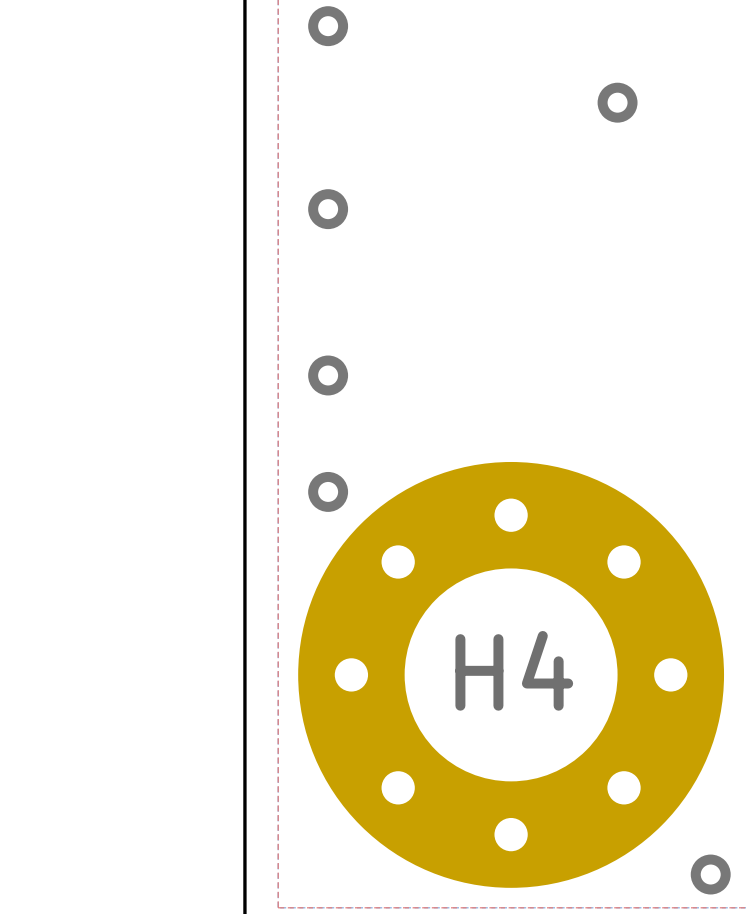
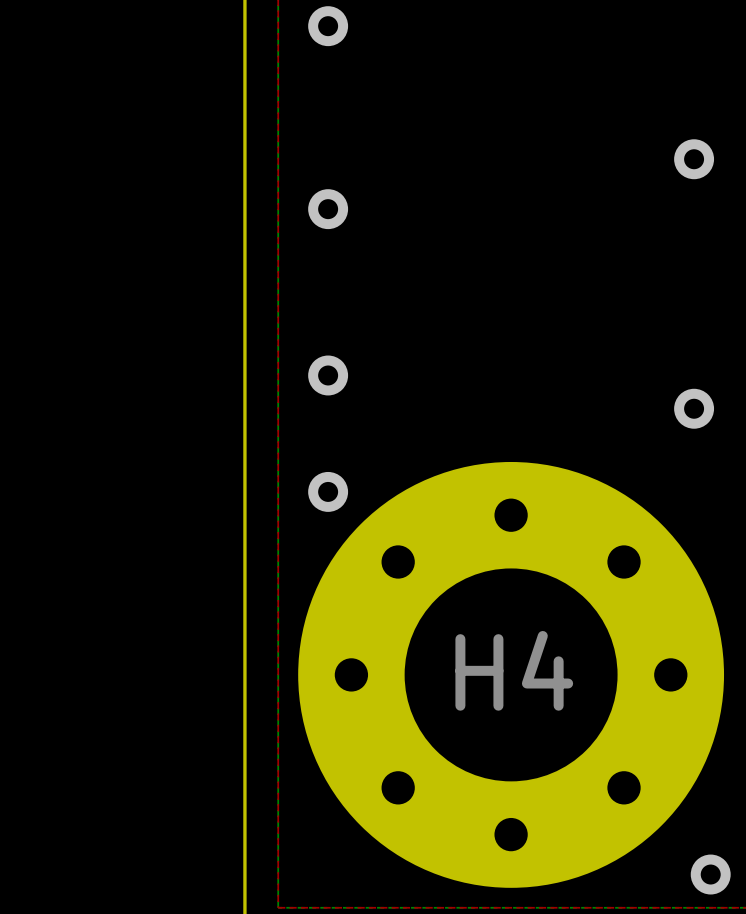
via position: (617, 102) -> (694, 159)
via: none -> (694, 408)

